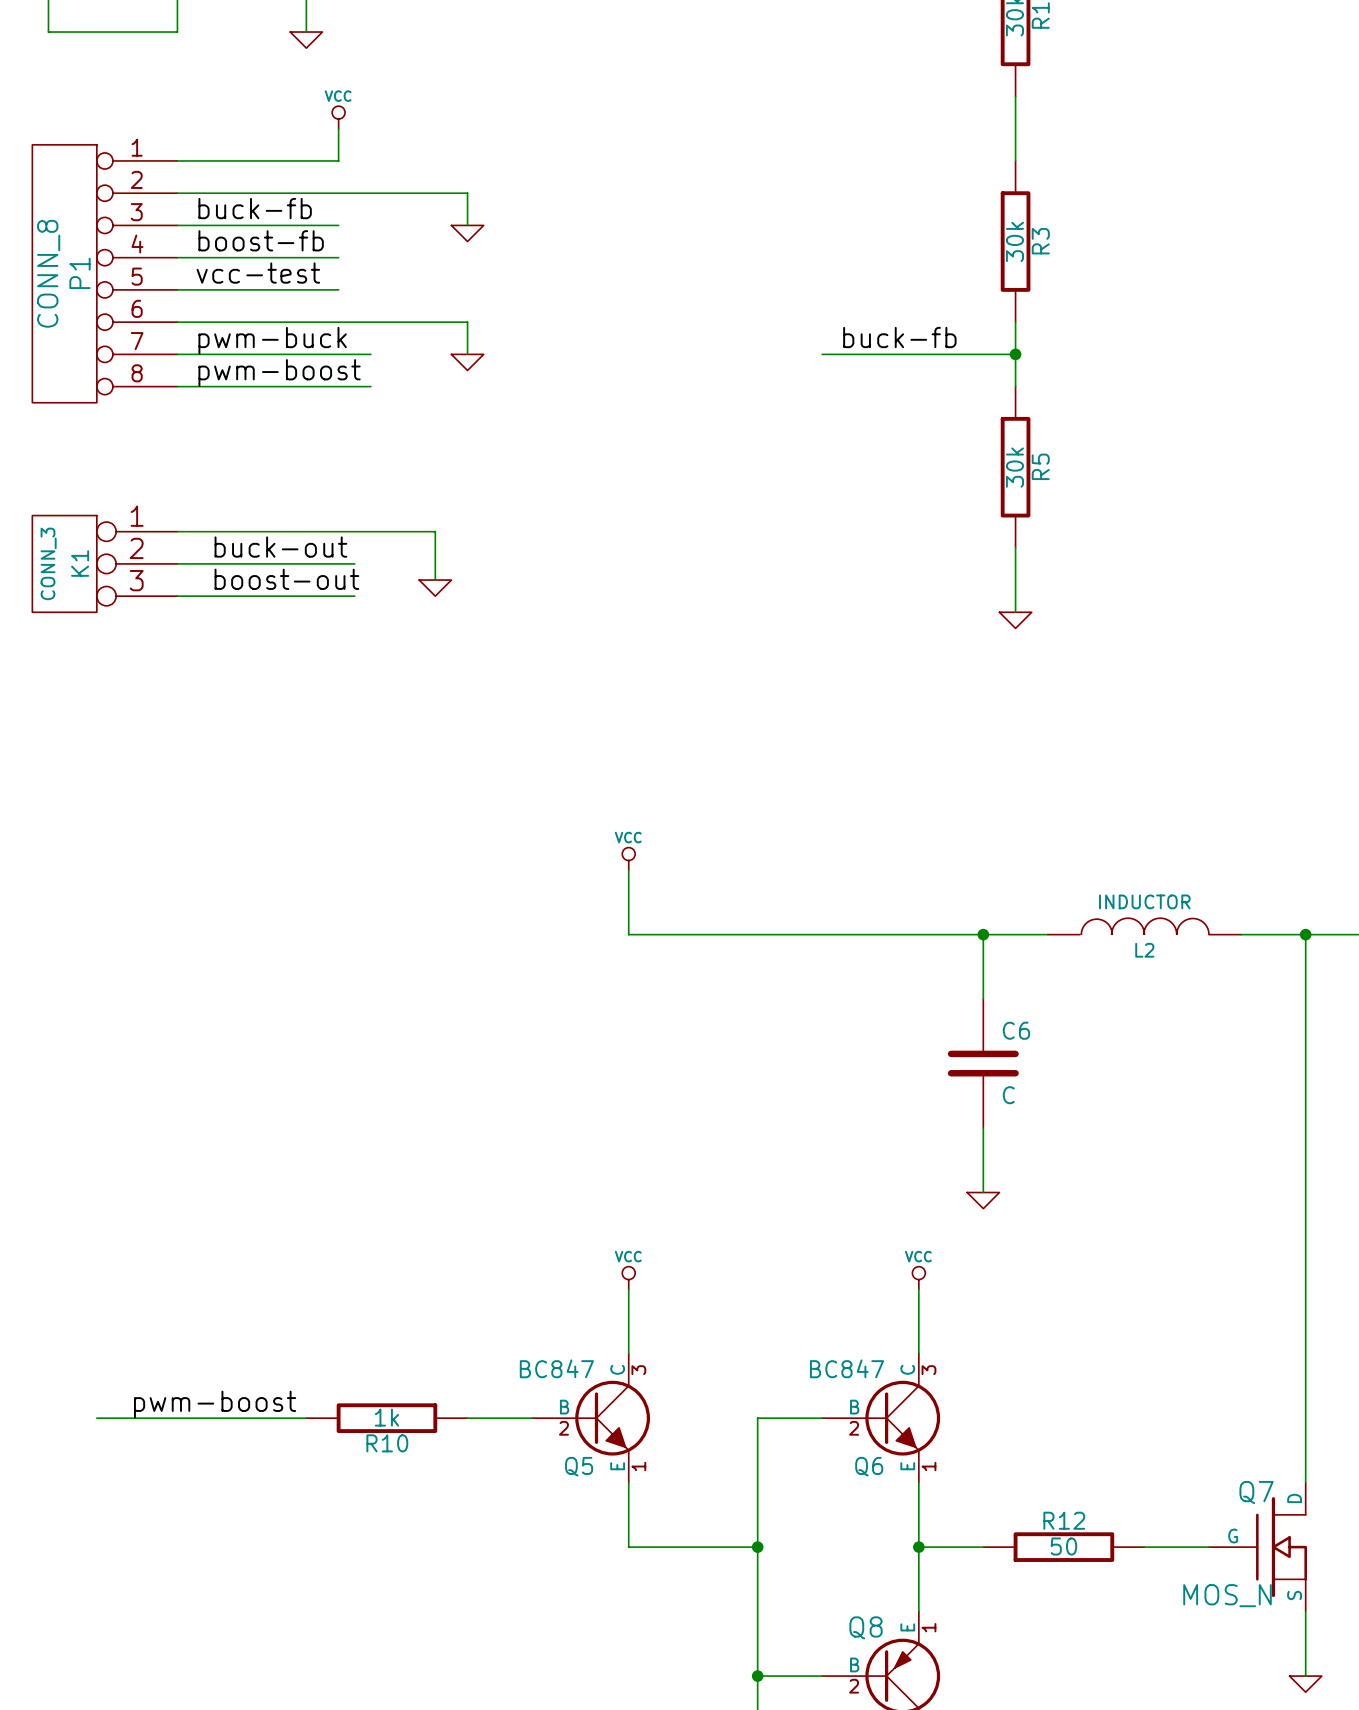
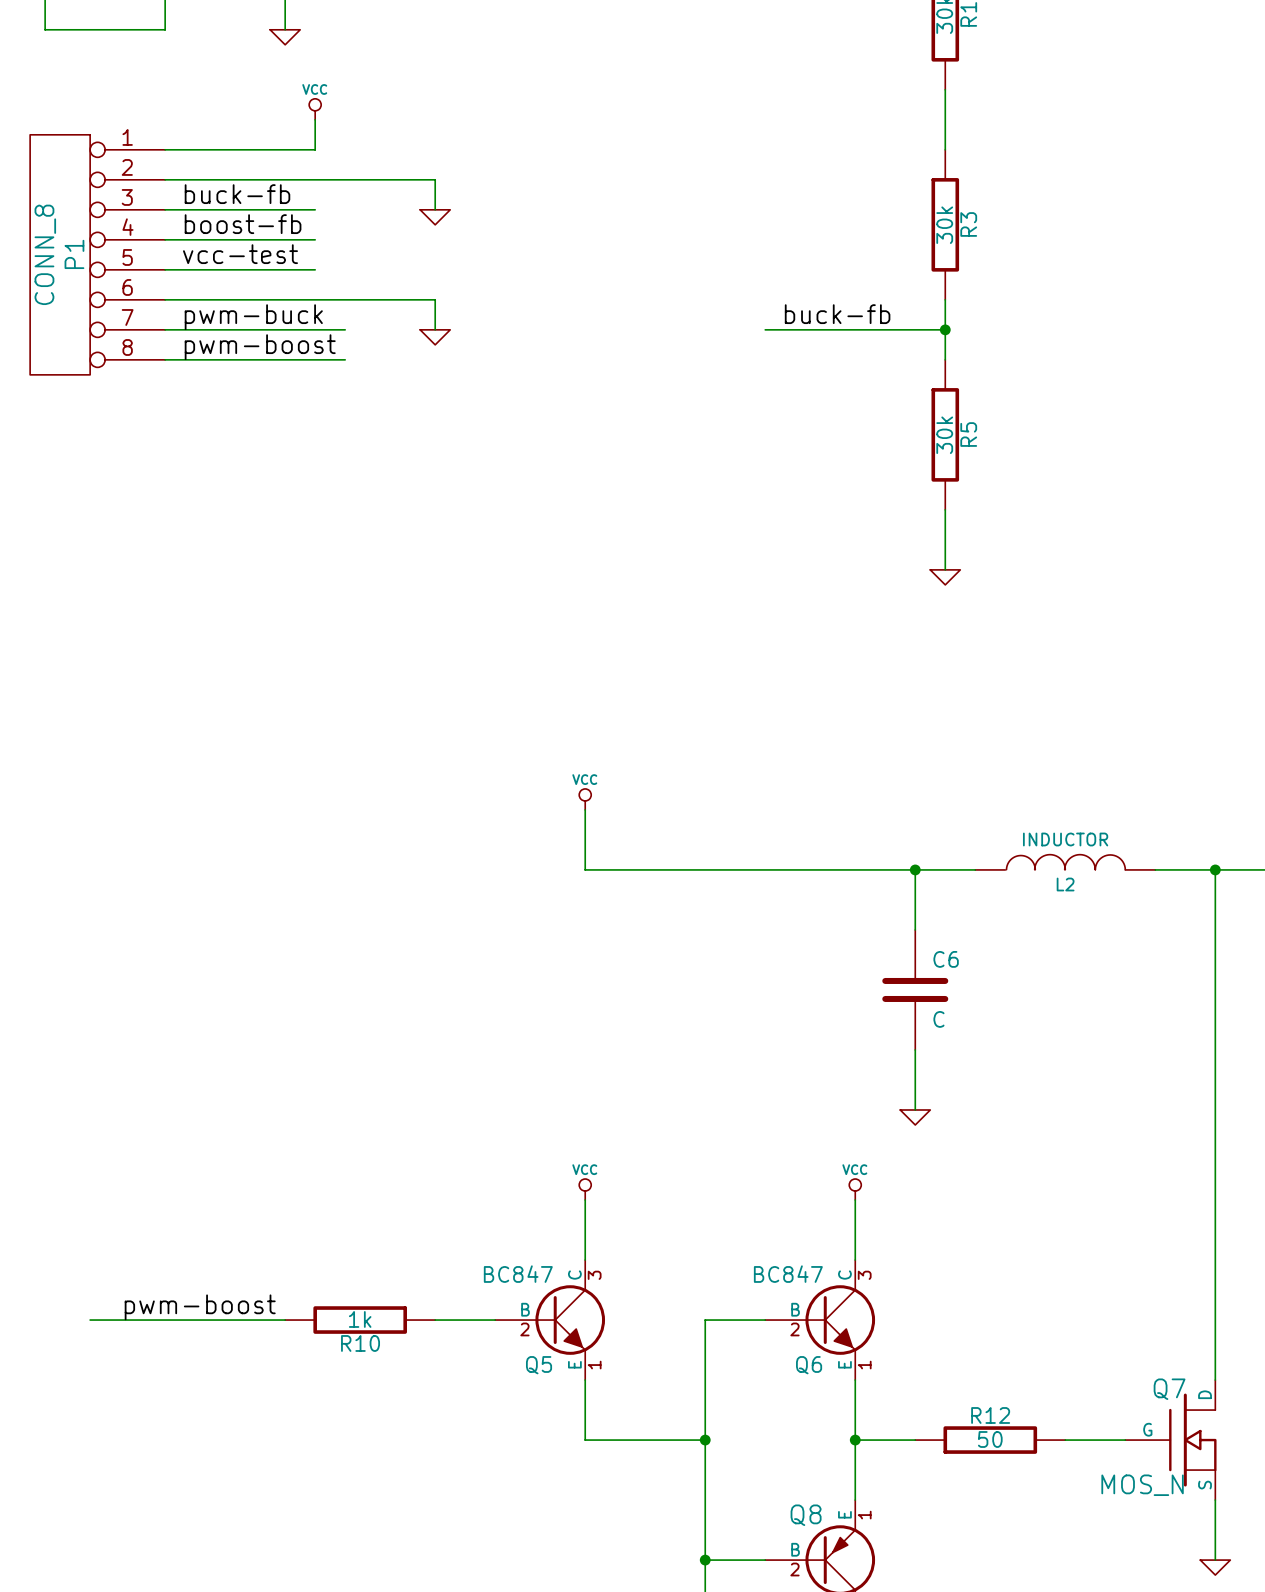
wire: (177, 531) (435, 531) (435, 580) -> none
label: buck-out (280, 547) -> none
K1: CONN_3 (104, 563) -> none
wire: (177, 563) (354, 563) -> none
label: boost-out (286, 579) -> none
power symbol: (435, 588) -> none
wire: (177, 596) (354, 596) -> none

